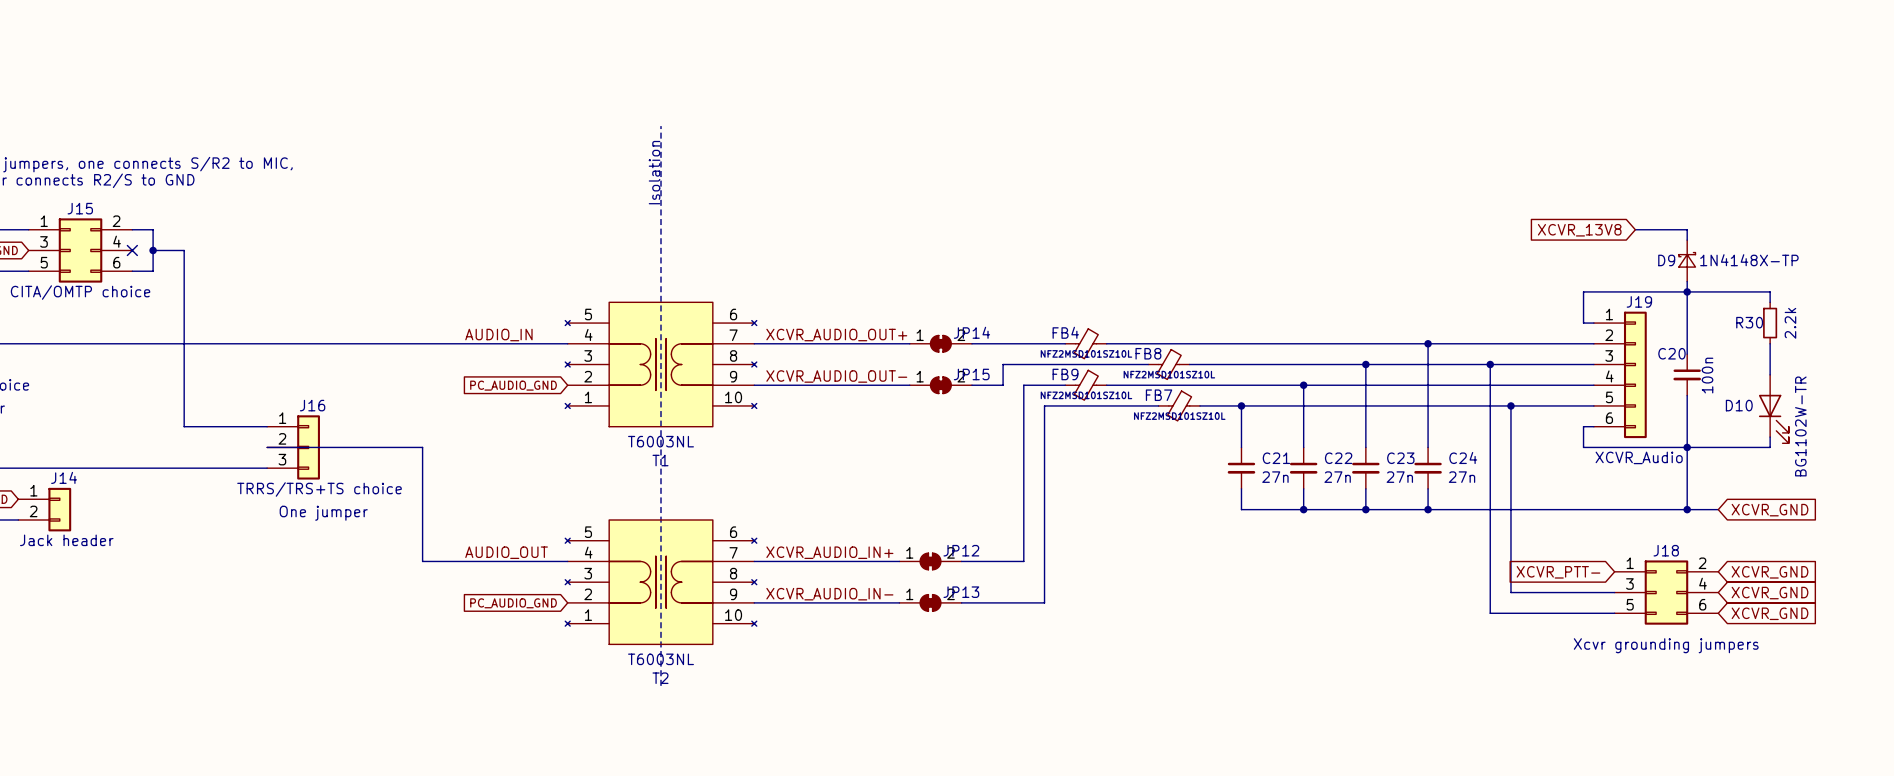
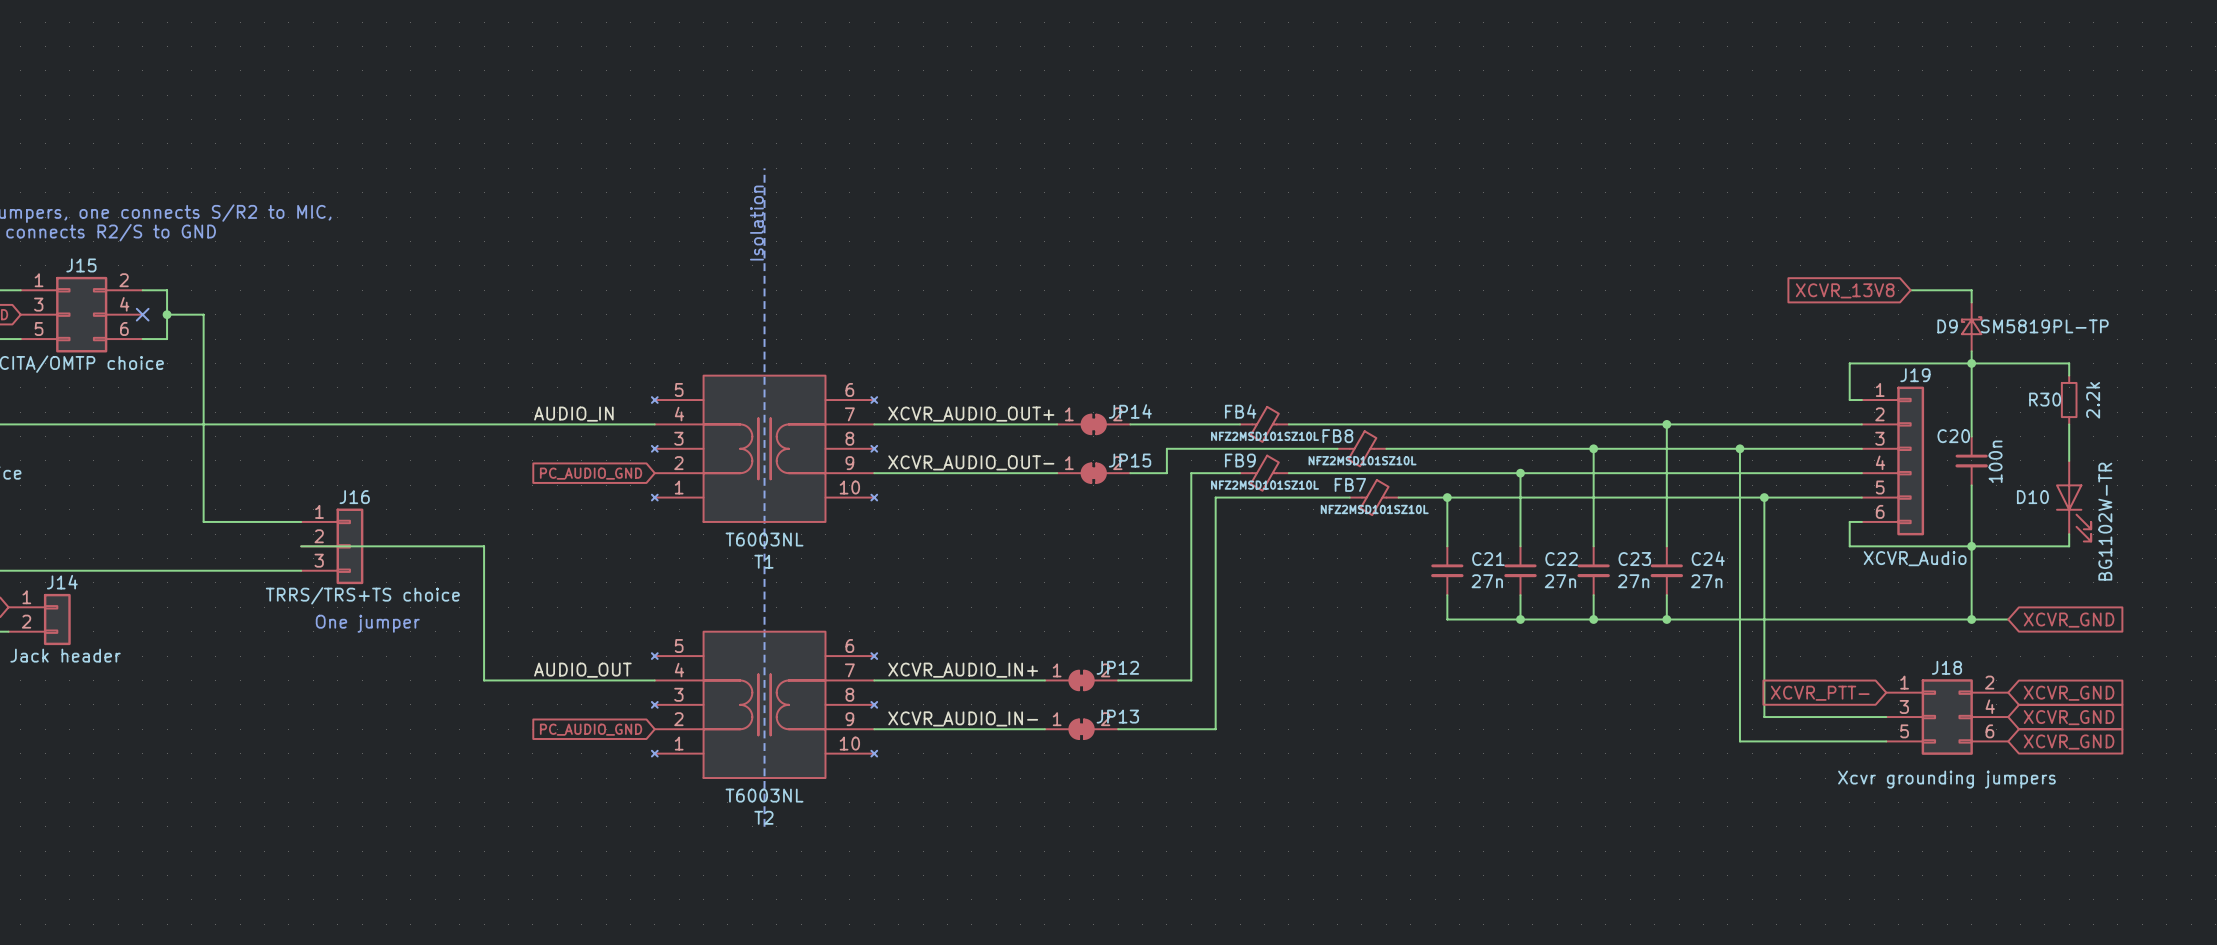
D9 value: 1N4148X-TP (1749, 260) -> SM5819PL-TP (2044, 326)

